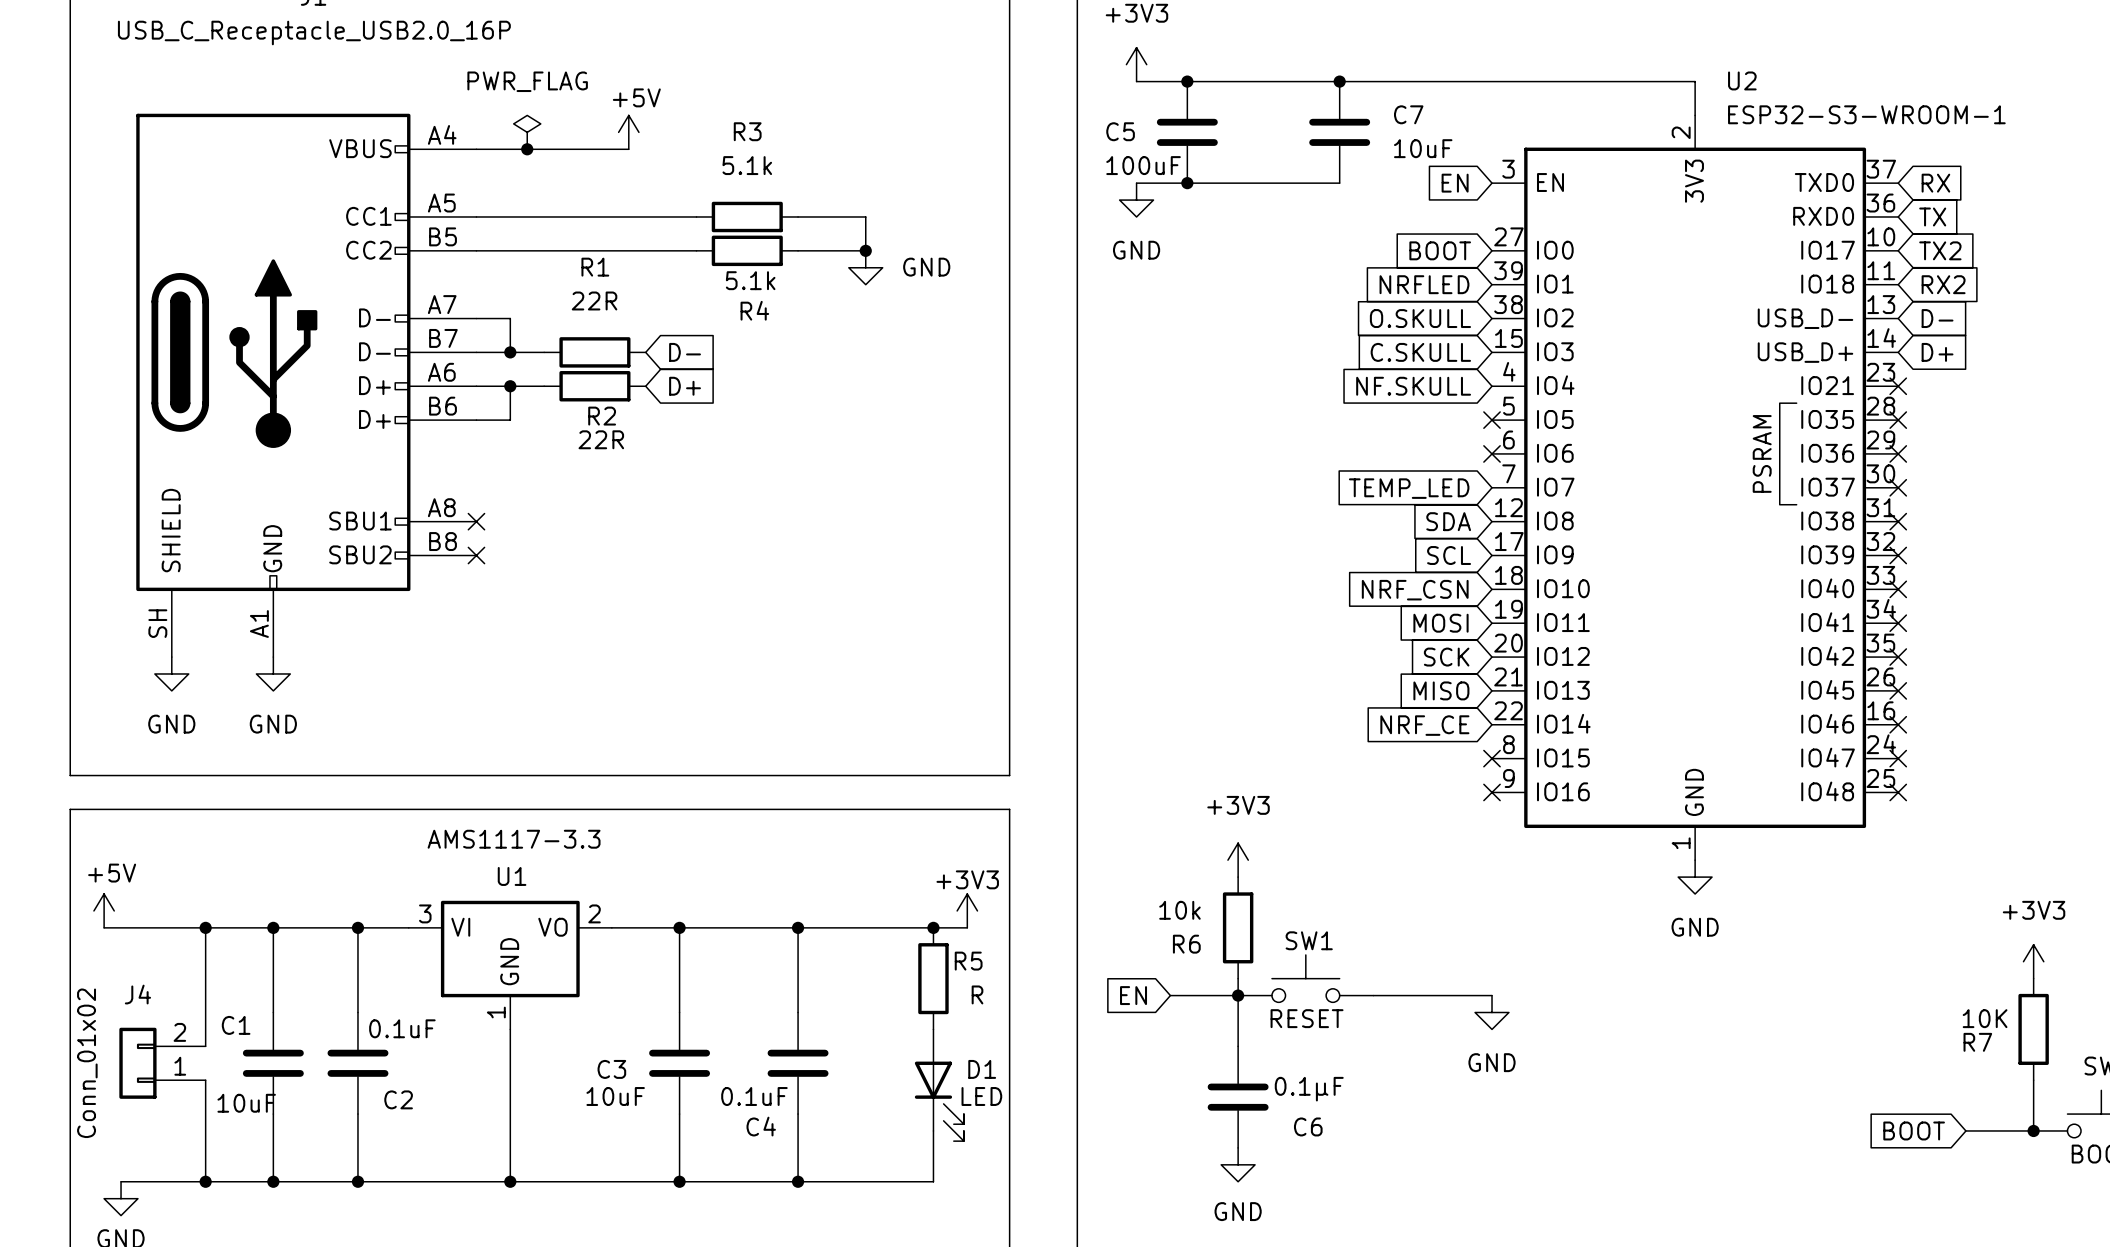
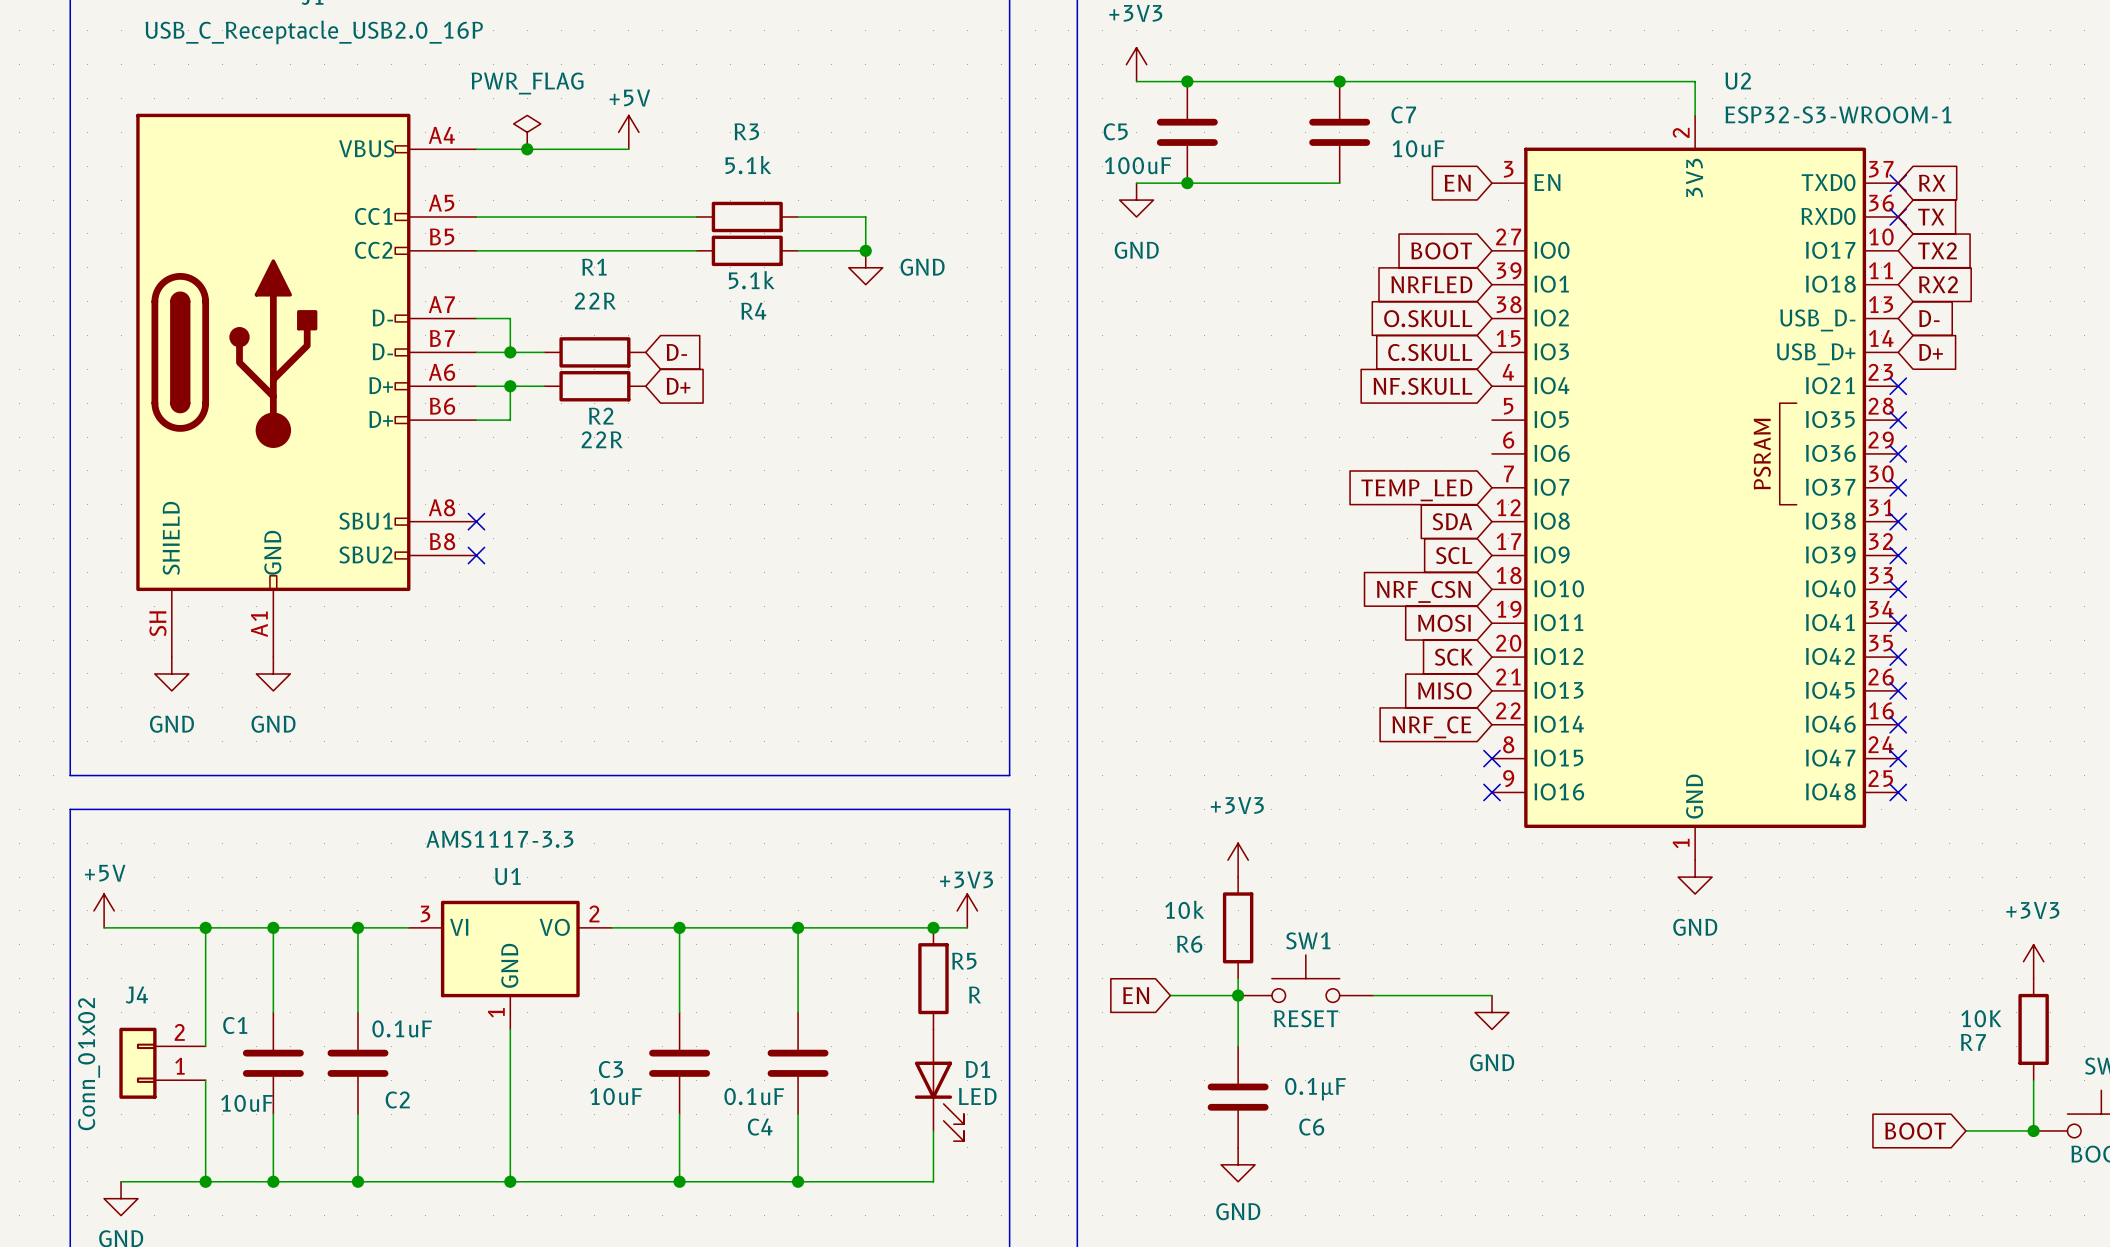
no-connect mark: none -> (1898, 183)
no-connect mark: none -> (1898, 216)
no-connect mark: (1492, 420) -> none
no-connect mark: (1492, 453) -> none

